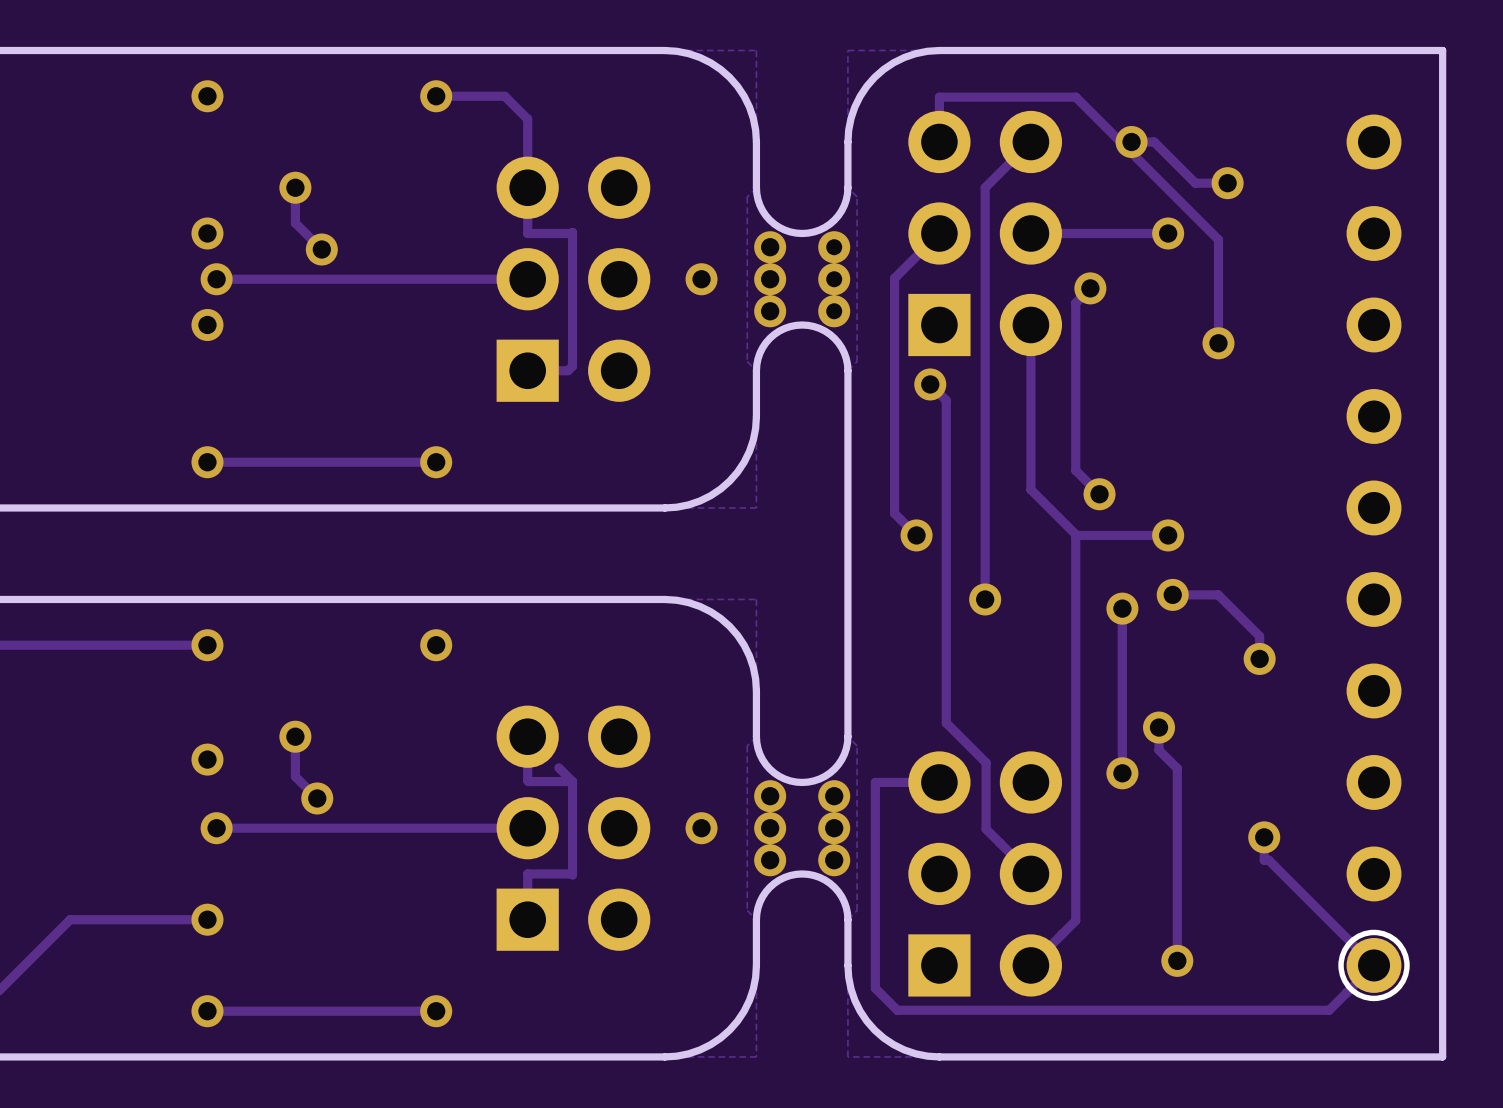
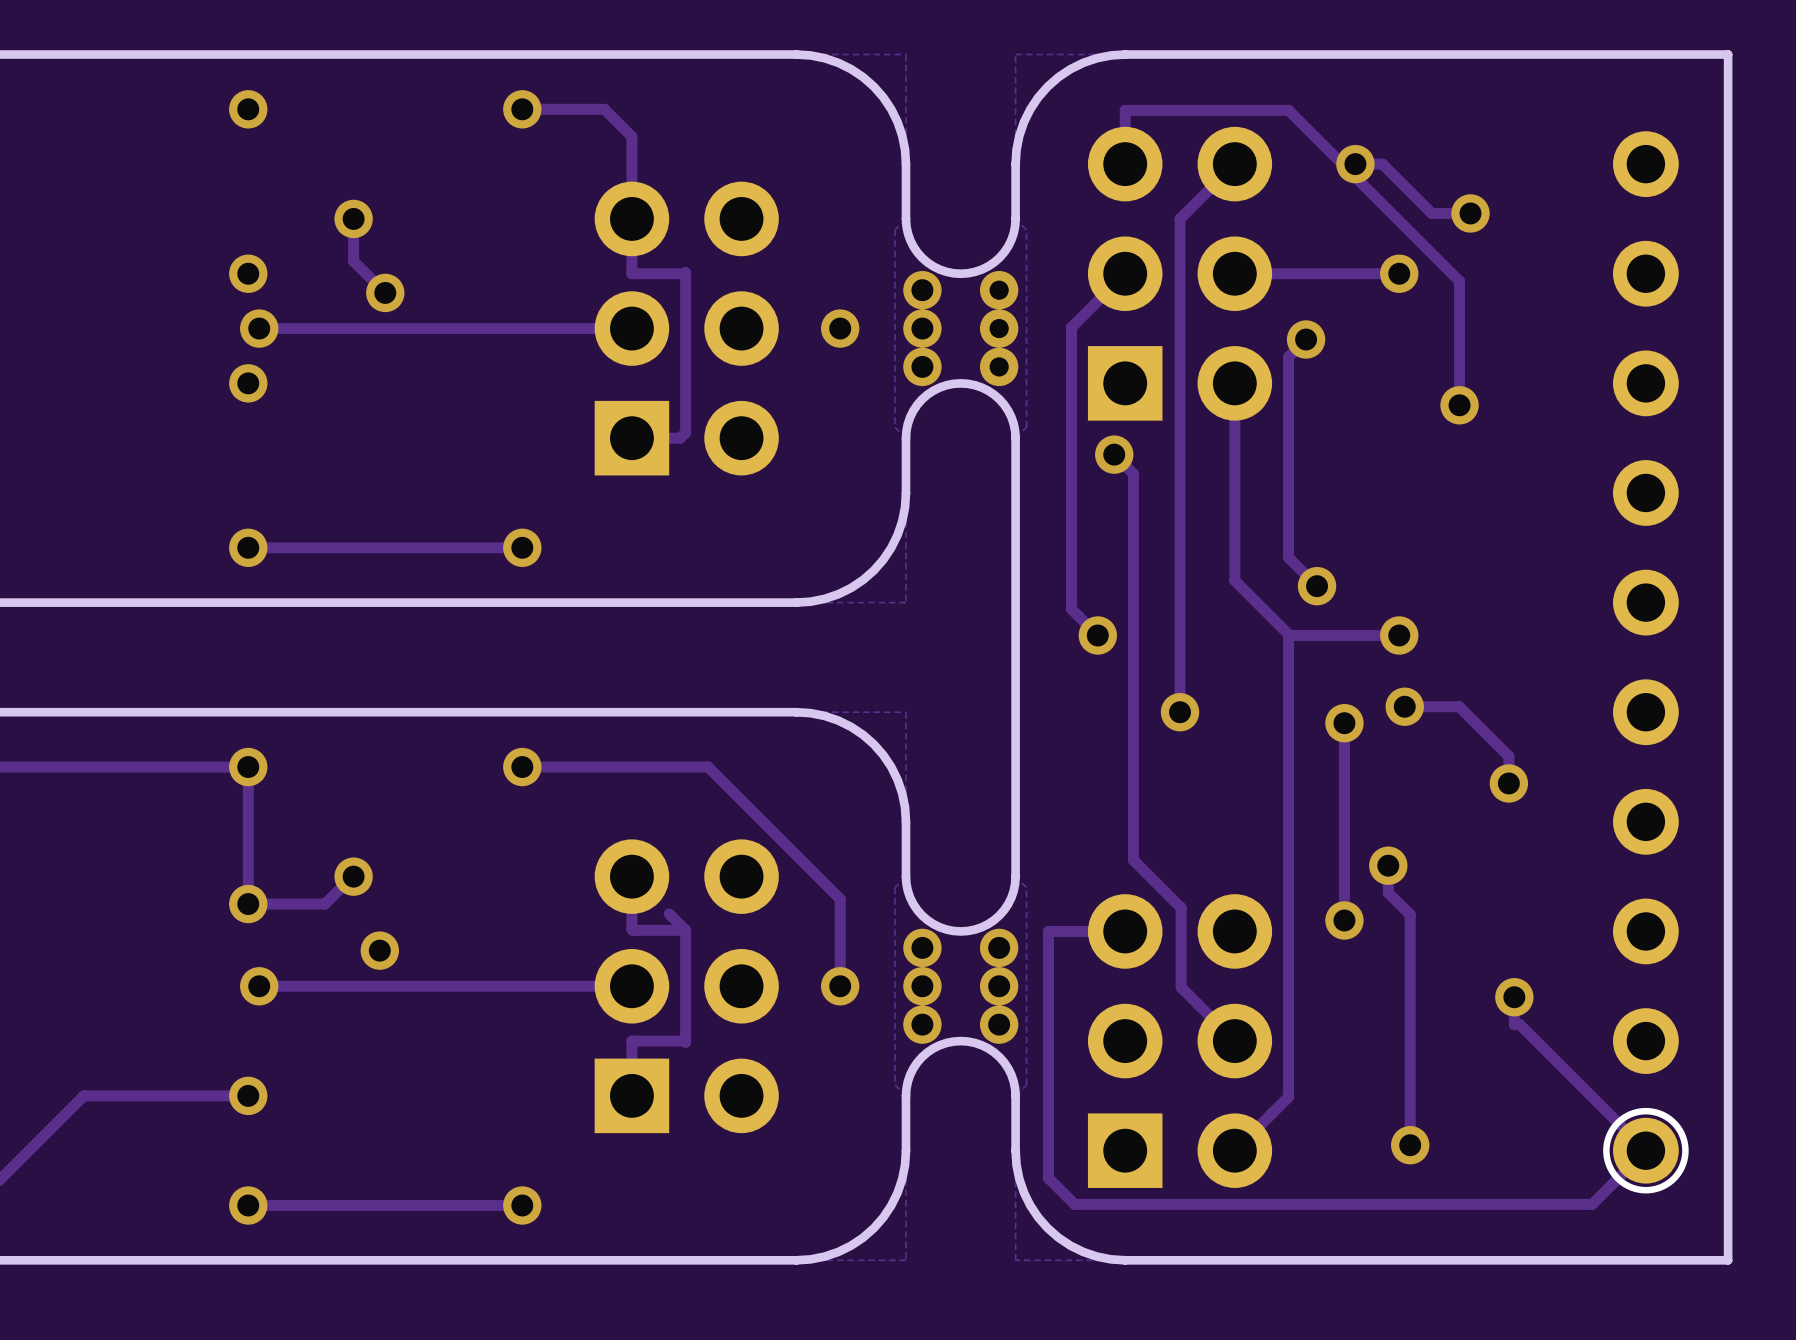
track: none -> (522, 767) (708, 767) (840, 899) (840, 986)
track: (295, 736) (295, 776) (317, 798) -> (352, 876) (325, 904) (248, 904) (248, 767)

